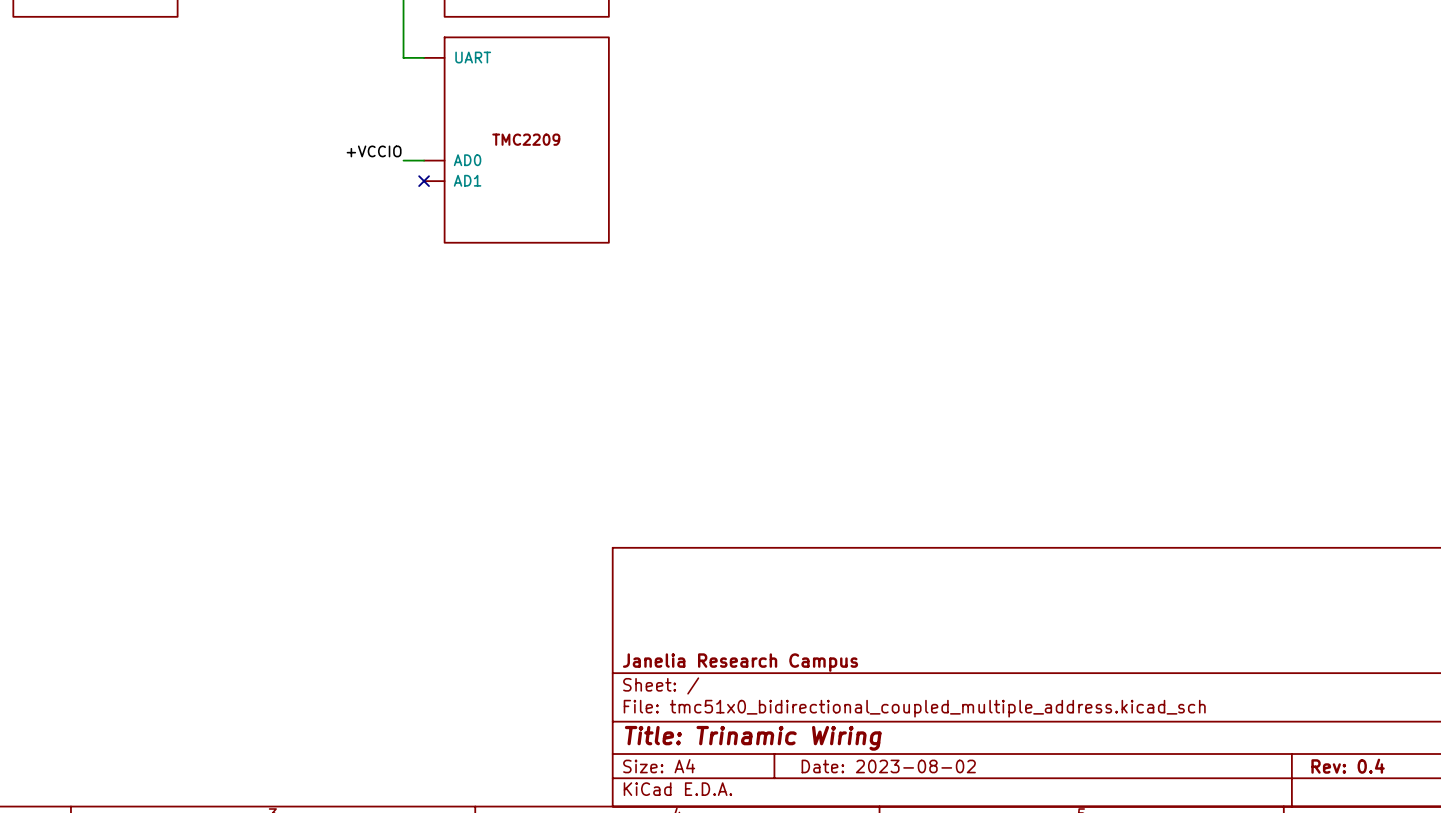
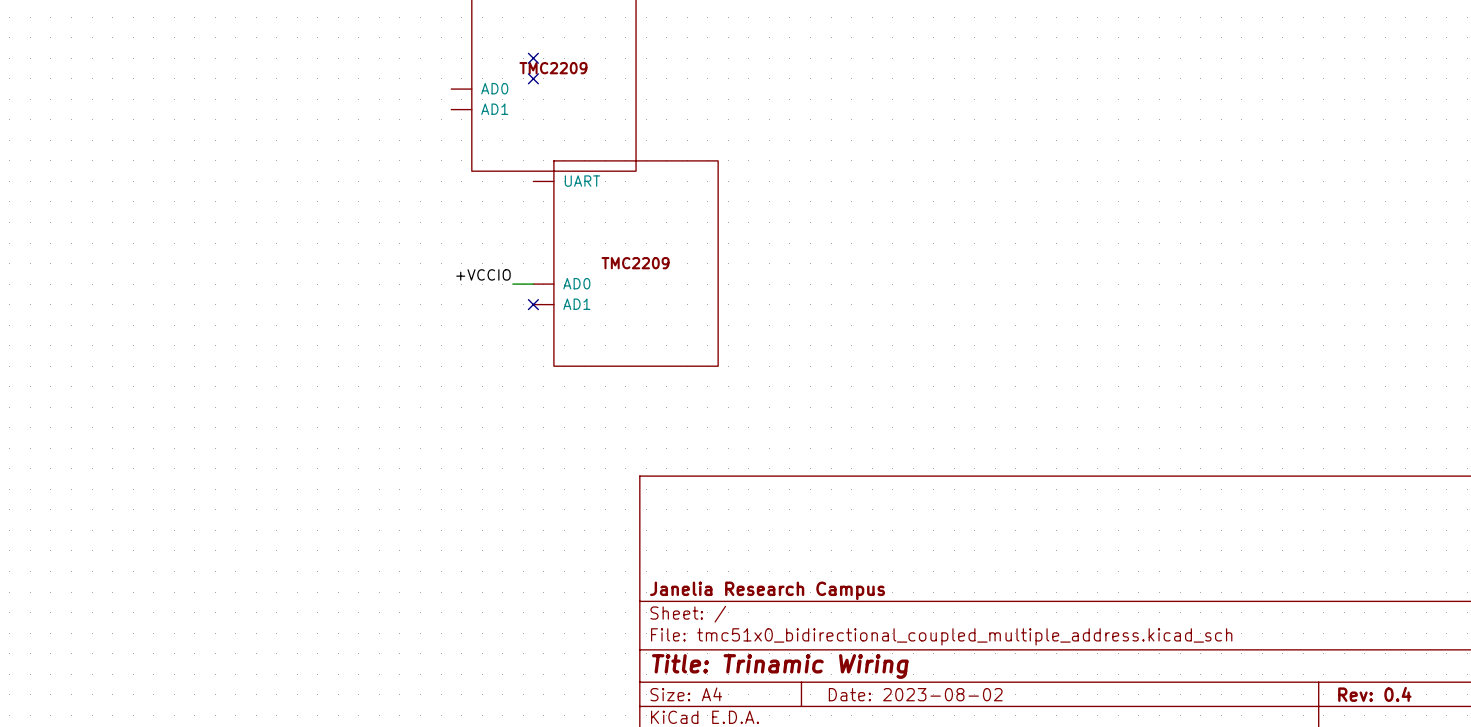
no-connect mark: none -> (533, 58)
no-connect mark: none -> (533, 78)
label: +VCCIO (374, 151) -> none
wire: (403, 160) (424, 160) -> none
no-connect mark: (424, 181) -> none
part: none -> (625, 263)
label: none -> +VCCIO (483, 274)
wire: none -> (512, 284) (533, 284)
no-connect mark: none -> (533, 304)

